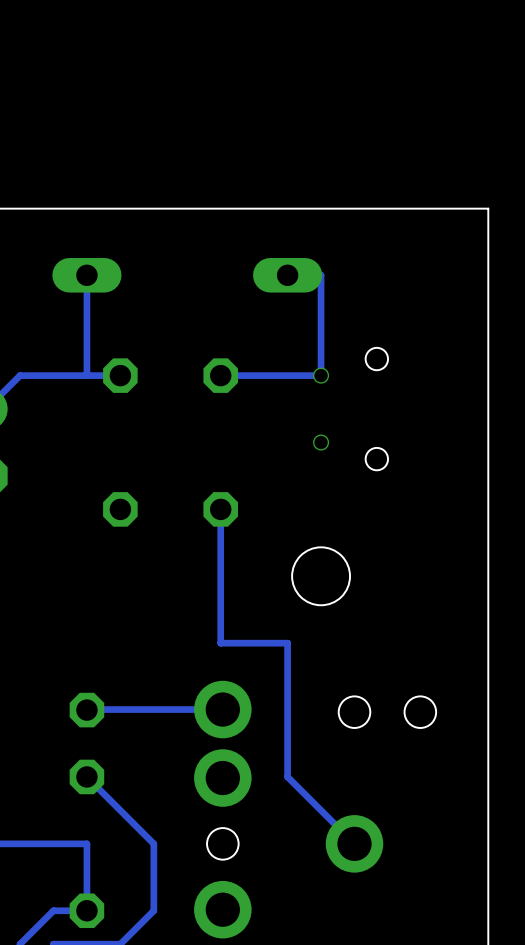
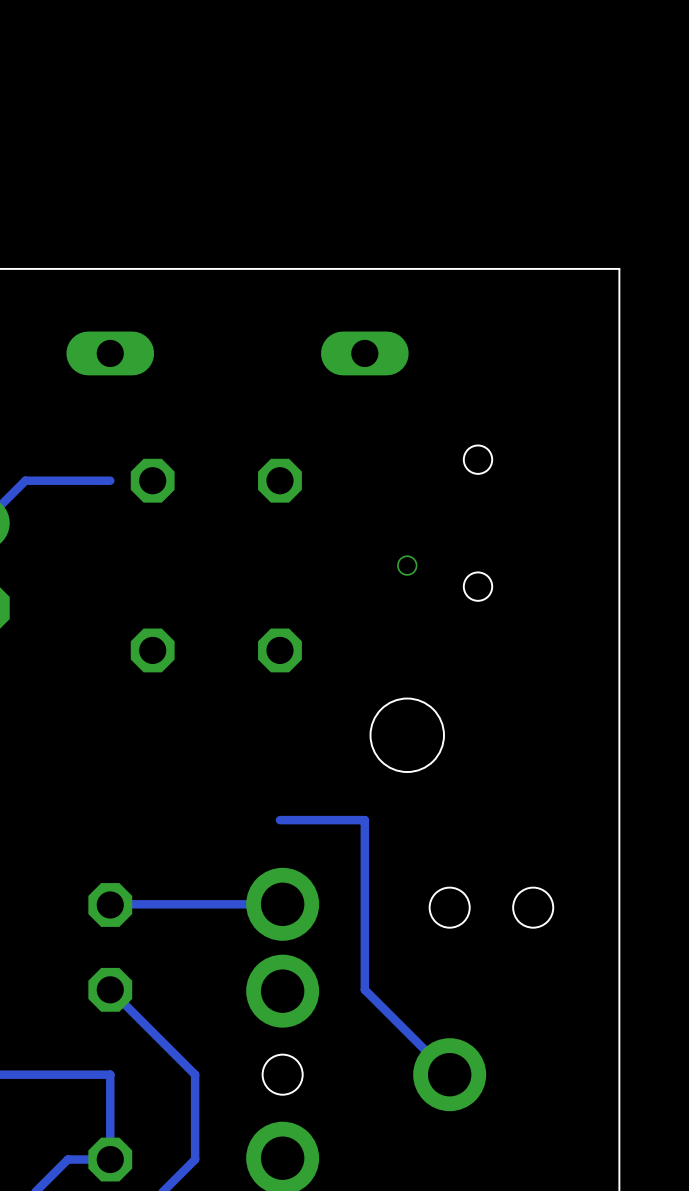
track: (86, 275) (86, 375) (120, 375) -> none
track: (287, 275) (321, 275) (321, 375) (220, 375) -> none
via: (321, 375) -> none
track: (220, 509) (220, 643) -> none

